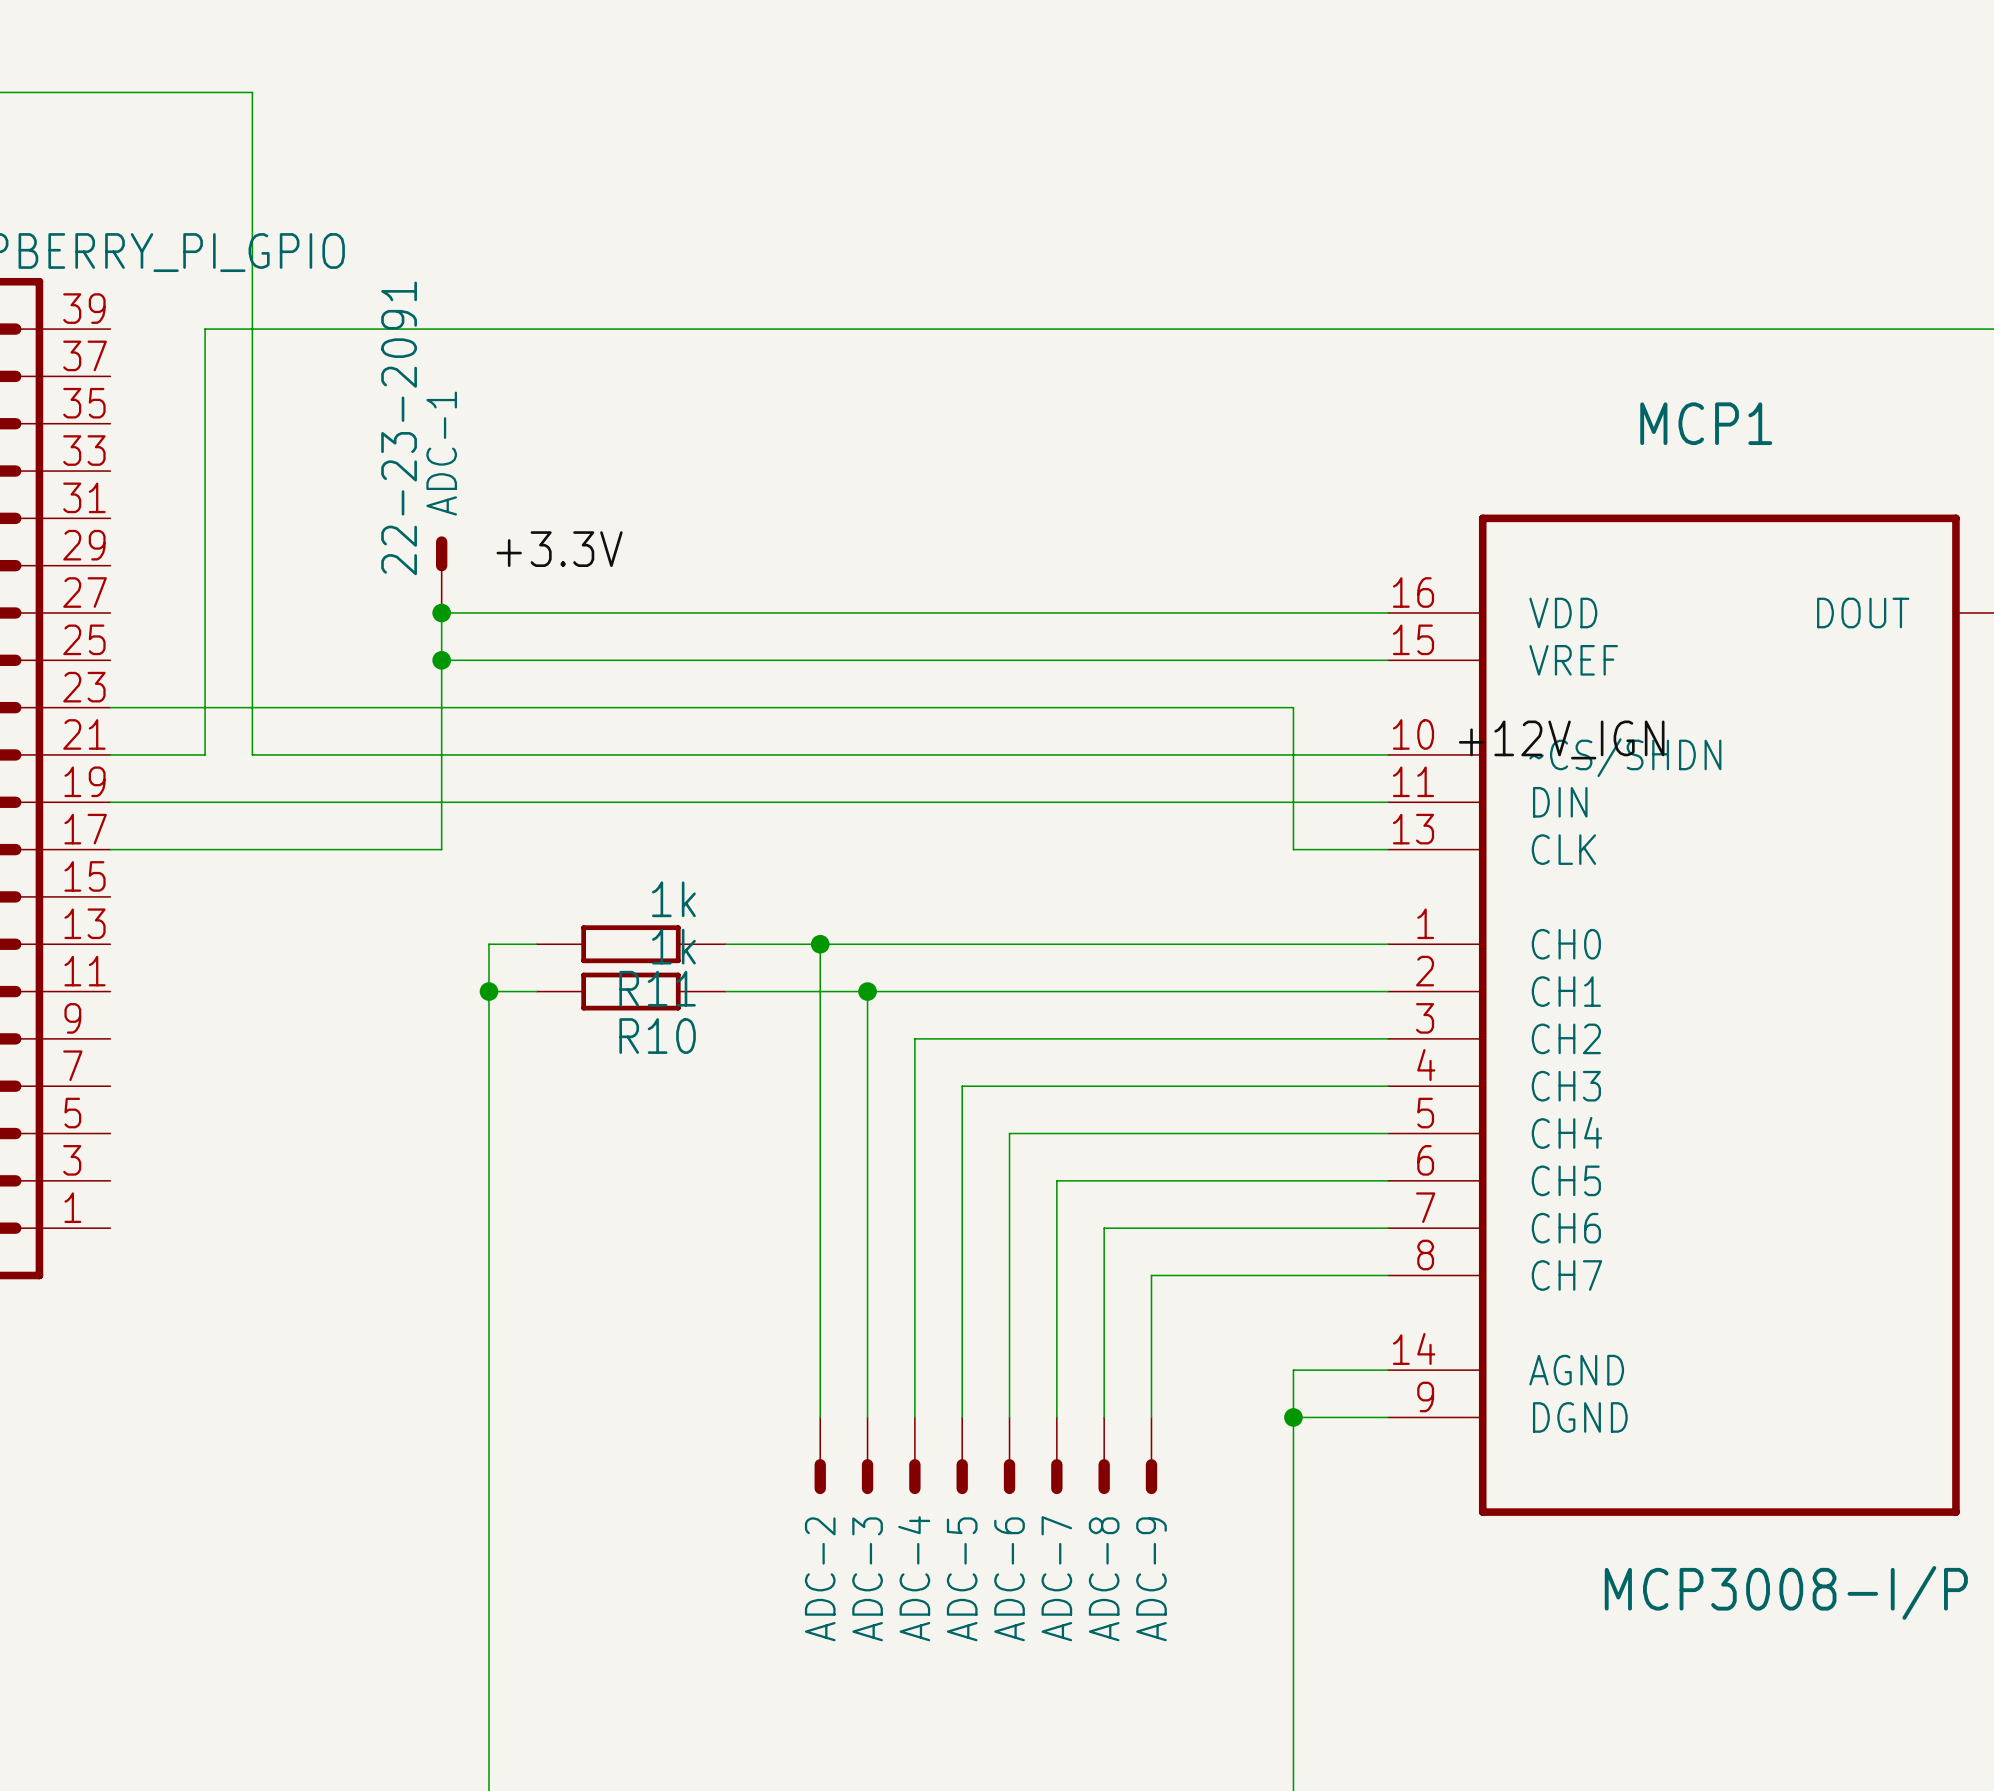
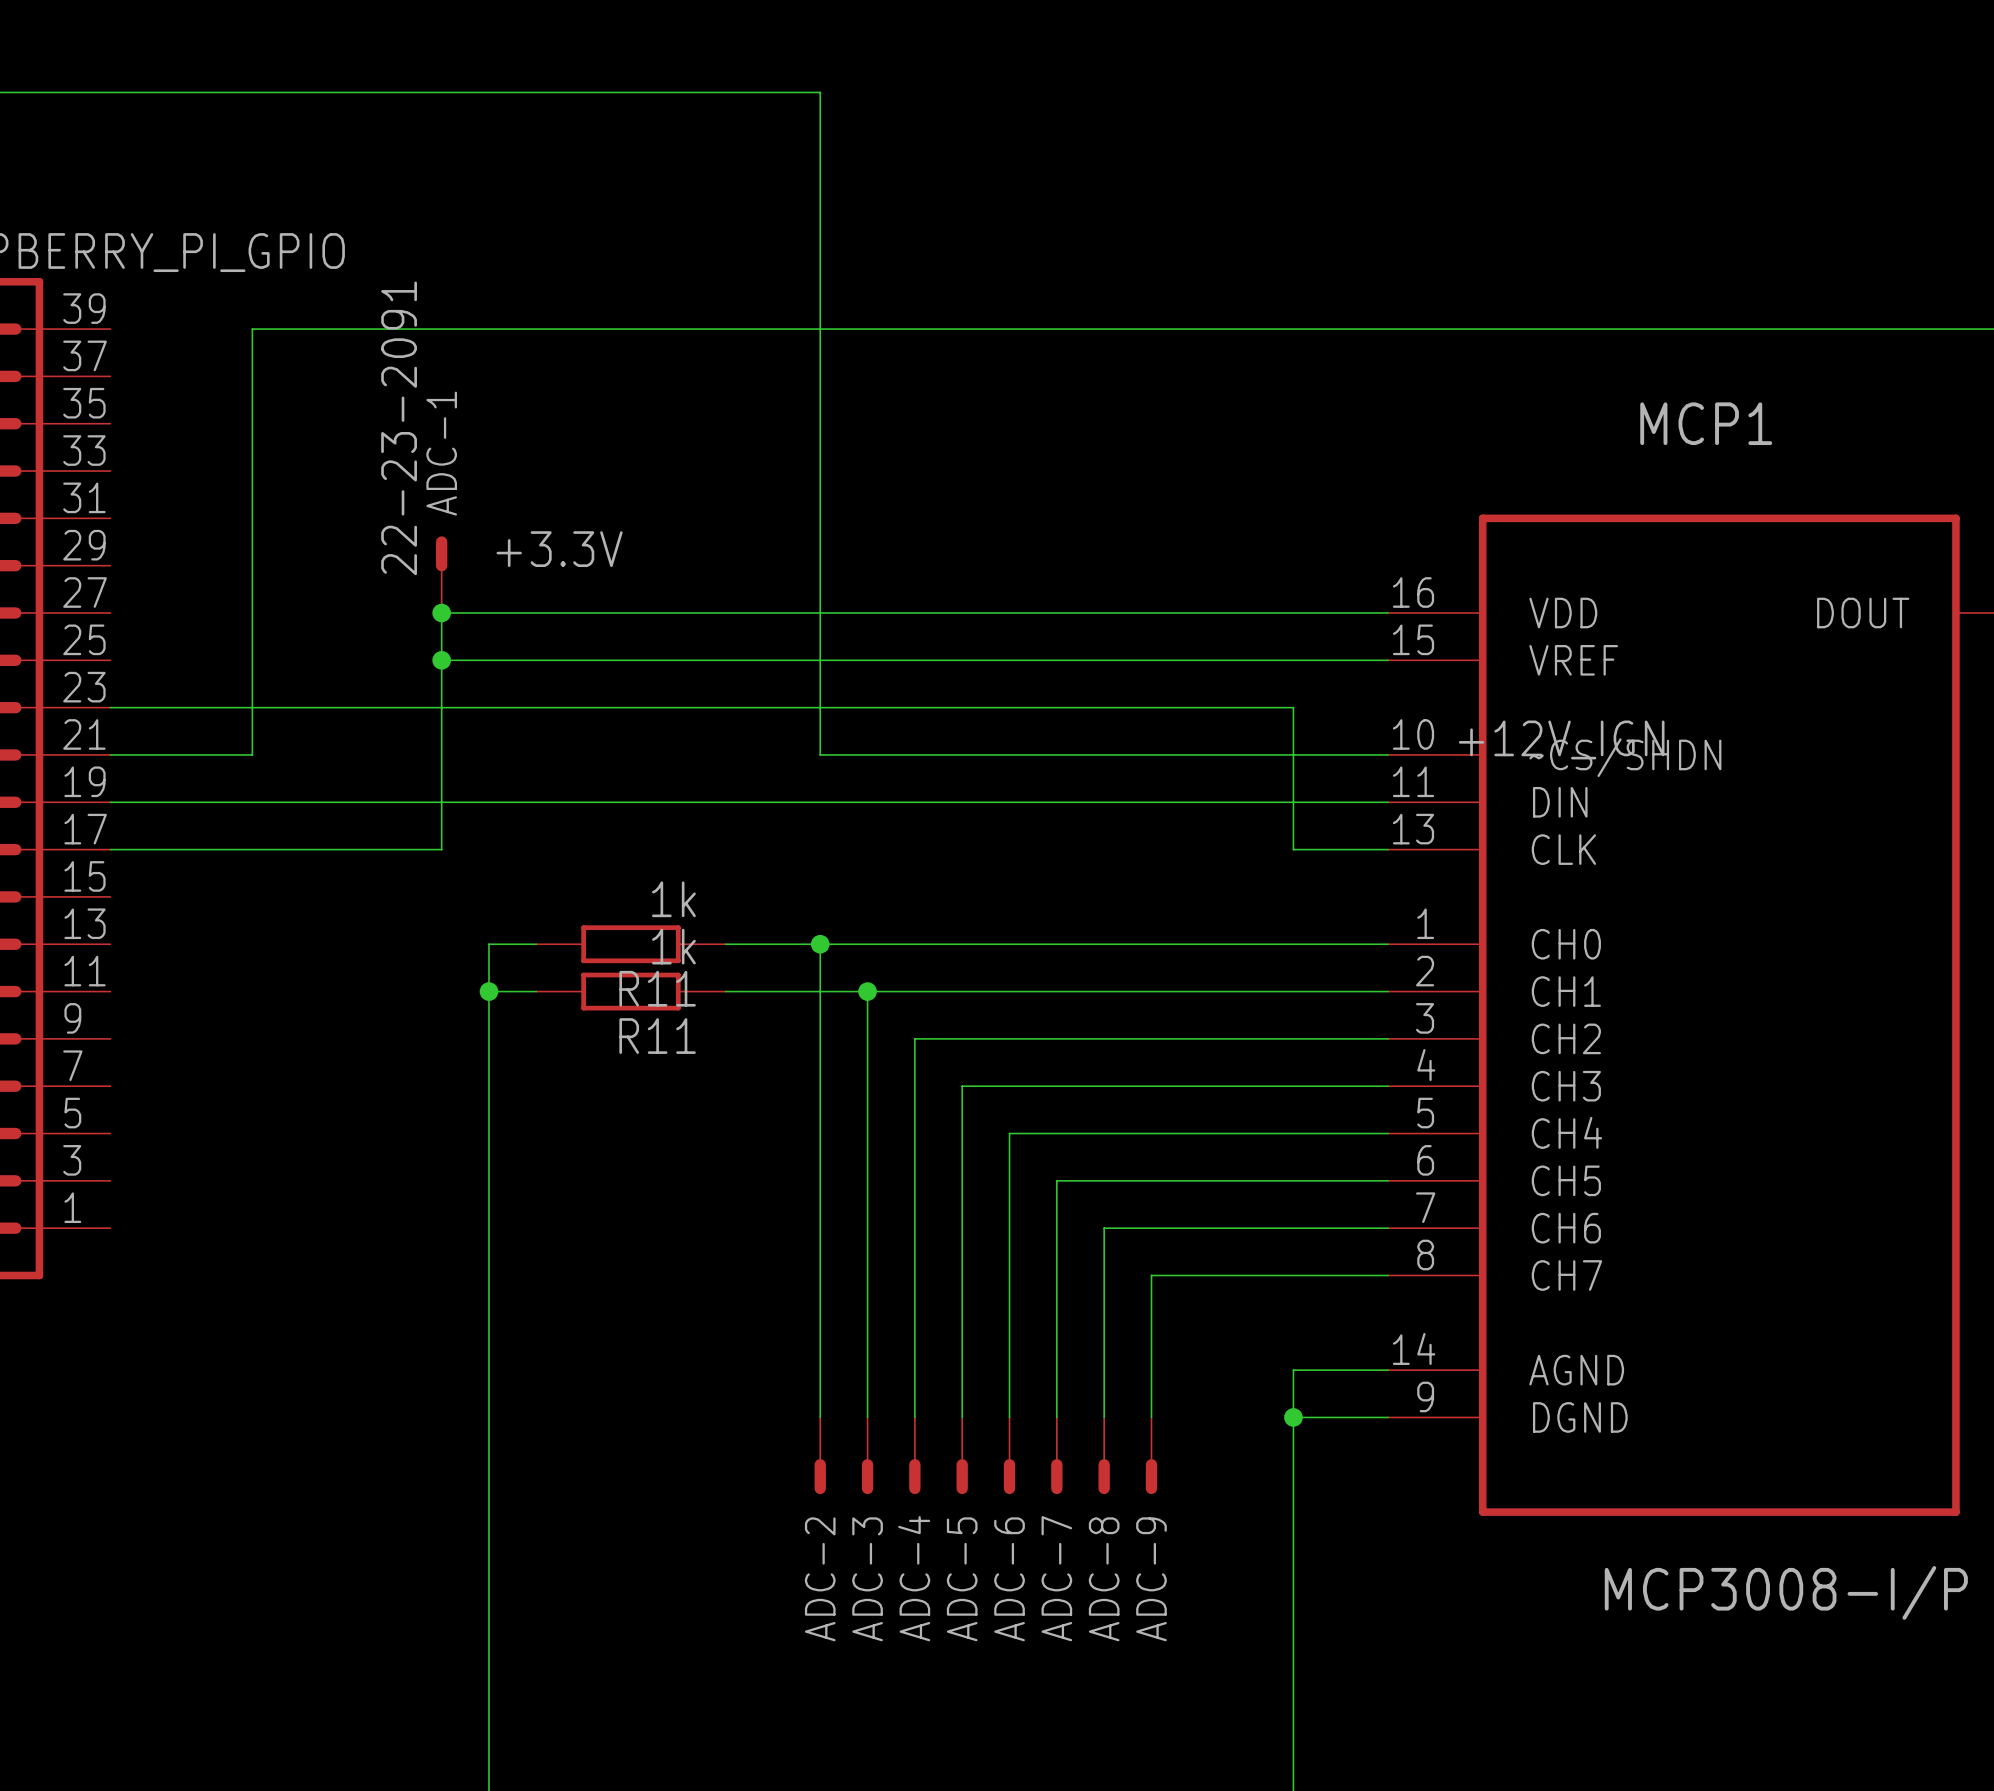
wire: (252, 92) (252, 329) (205, 329) (205, 754) -> (252, 92) (820, 92) (820, 754)
wire: (252, 754) (820, 754) -> (252, 754) (205, 754)
R10 name: R10 (657, 1036) -> R11 (657, 1036)

